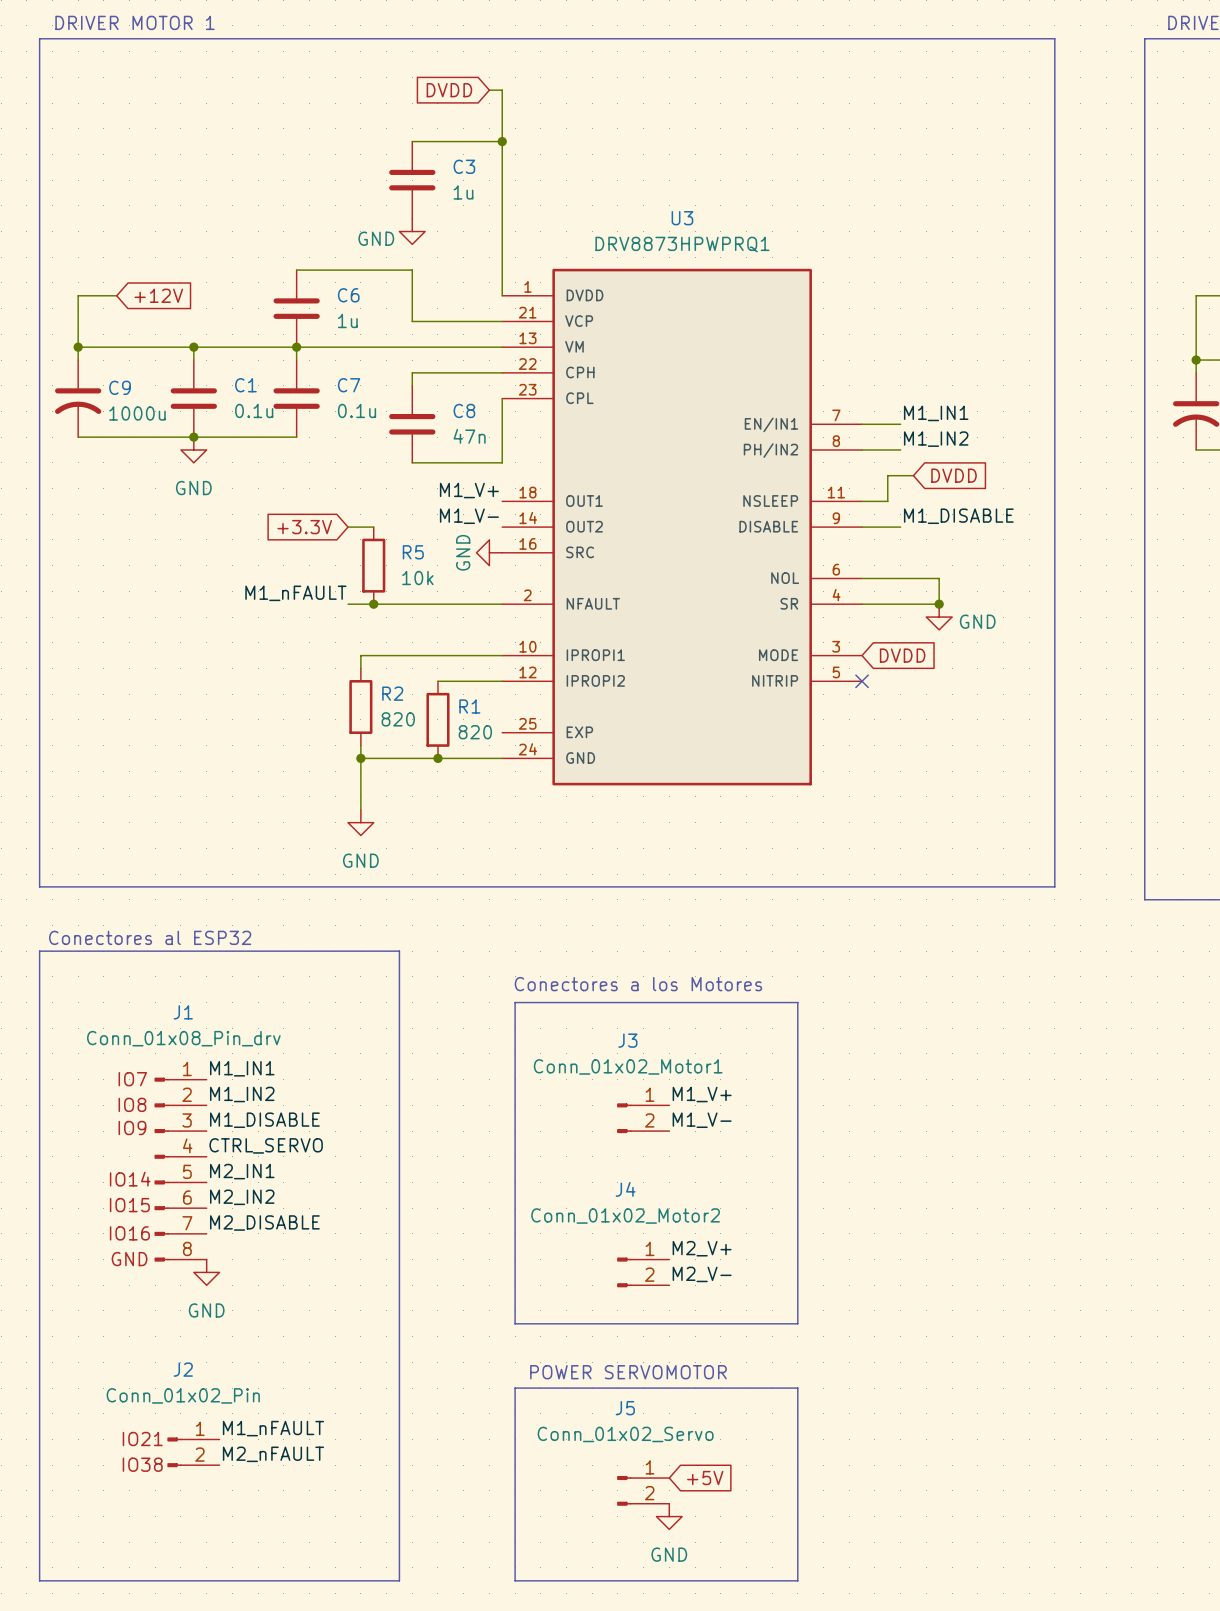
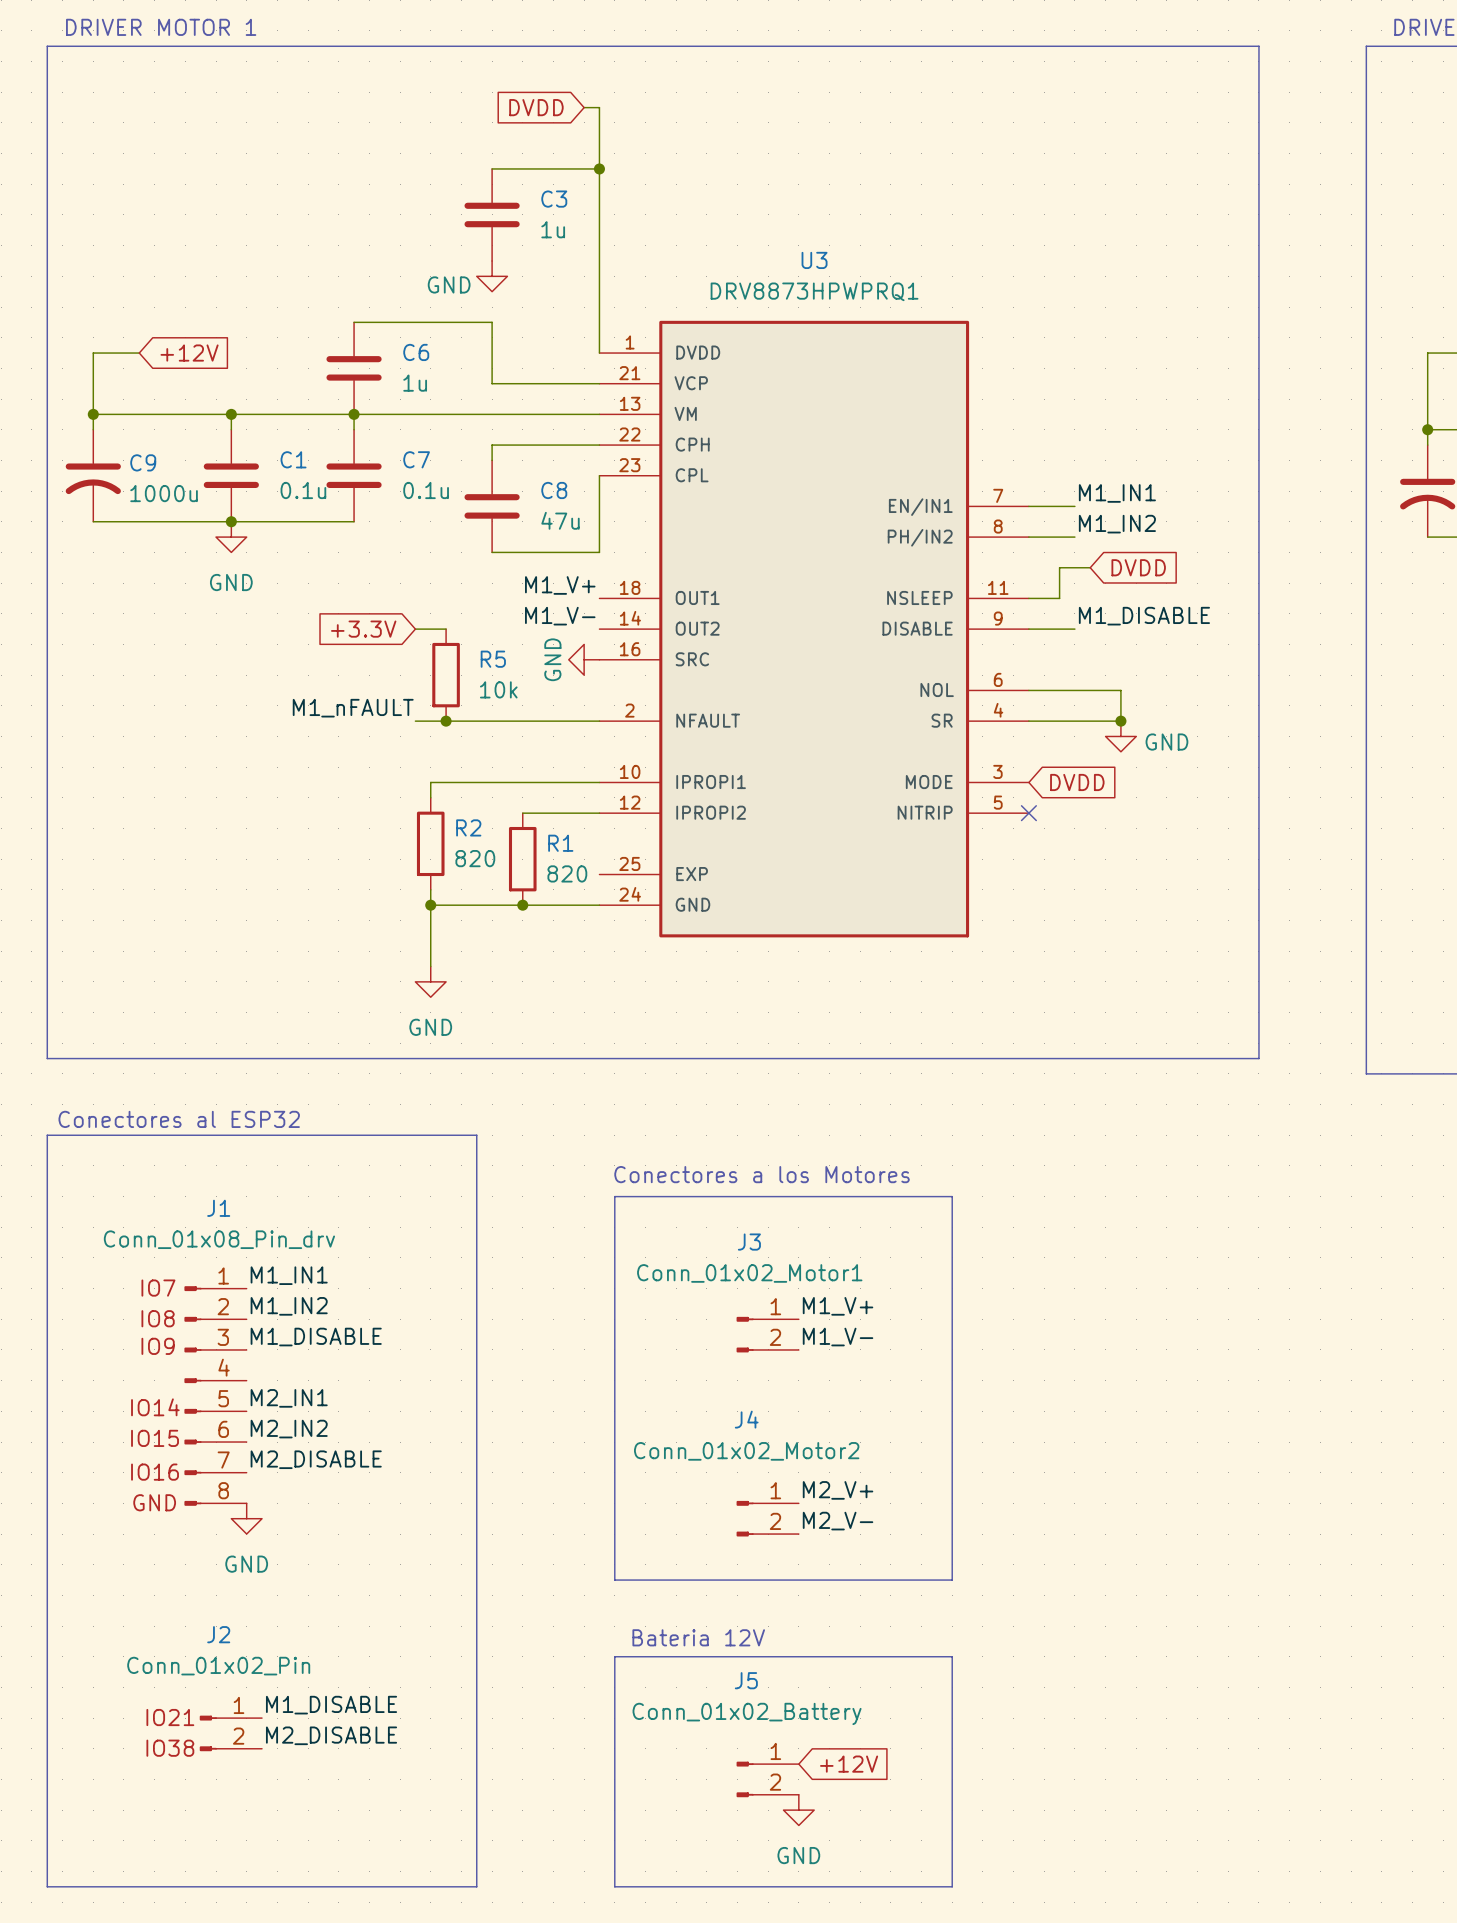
C8 value: 47n (469, 436) -> 47u (560, 520)
label: CTRL_SERVO (266, 1145) -> none
text: none -> Bateria 12V (698, 1637)
text: POWER SERVOMOTOR (628, 1372) -> none
label: M1_nFAULT (273, 1428) -> M1_DISABLE (331, 1705)
J5 value: Conn_01x02_Servo (625, 1434) -> Conn_01x02_Battery (747, 1713)
label: M2_nFAULT (273, 1454) -> M2_DISABLE (331, 1735)
global label: +5V (705, 1478) -> +12V (849, 1764)

